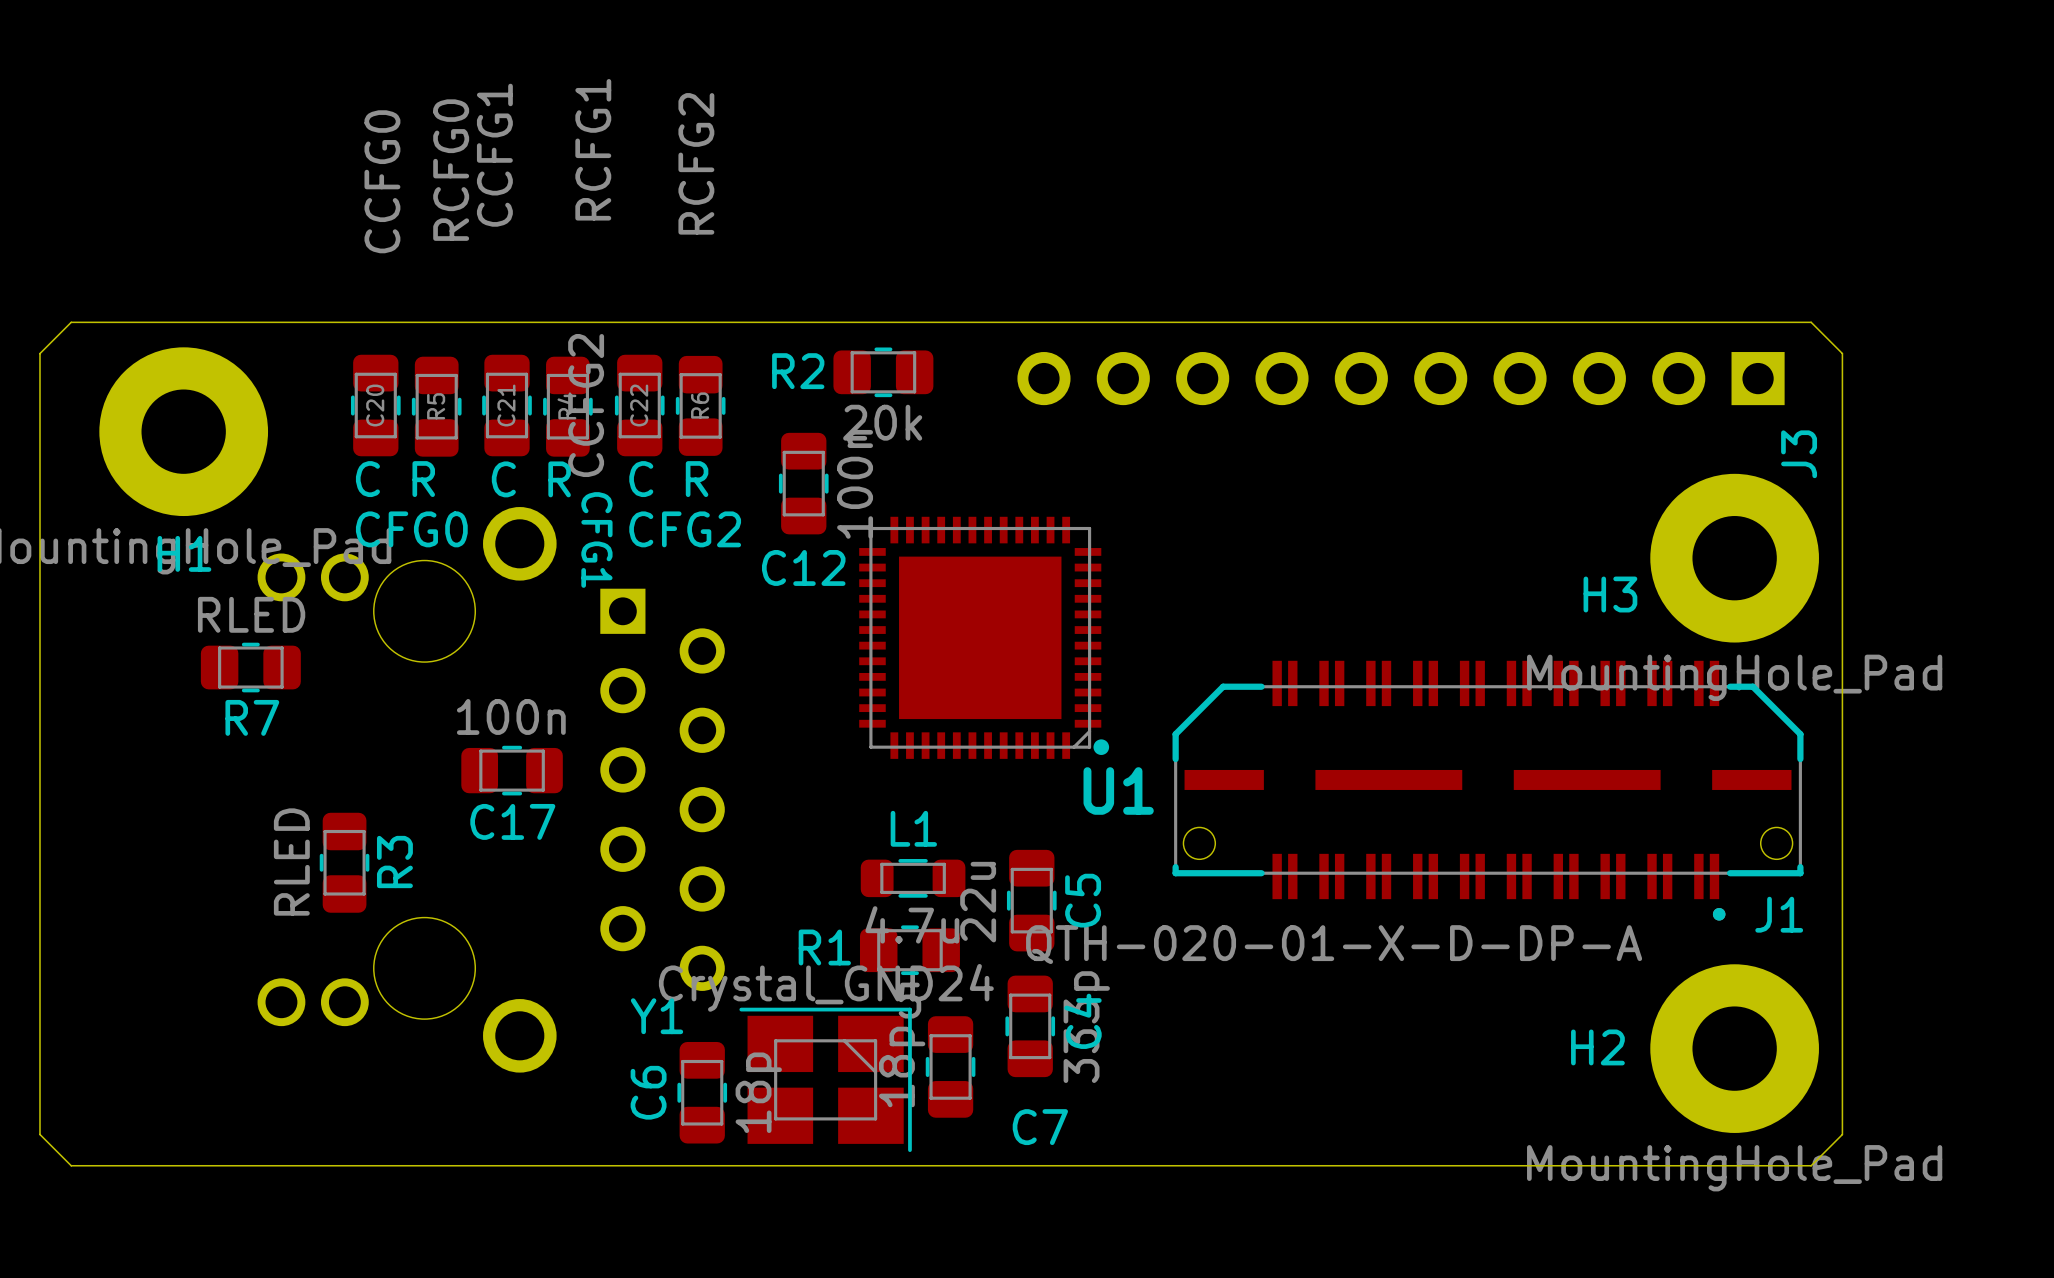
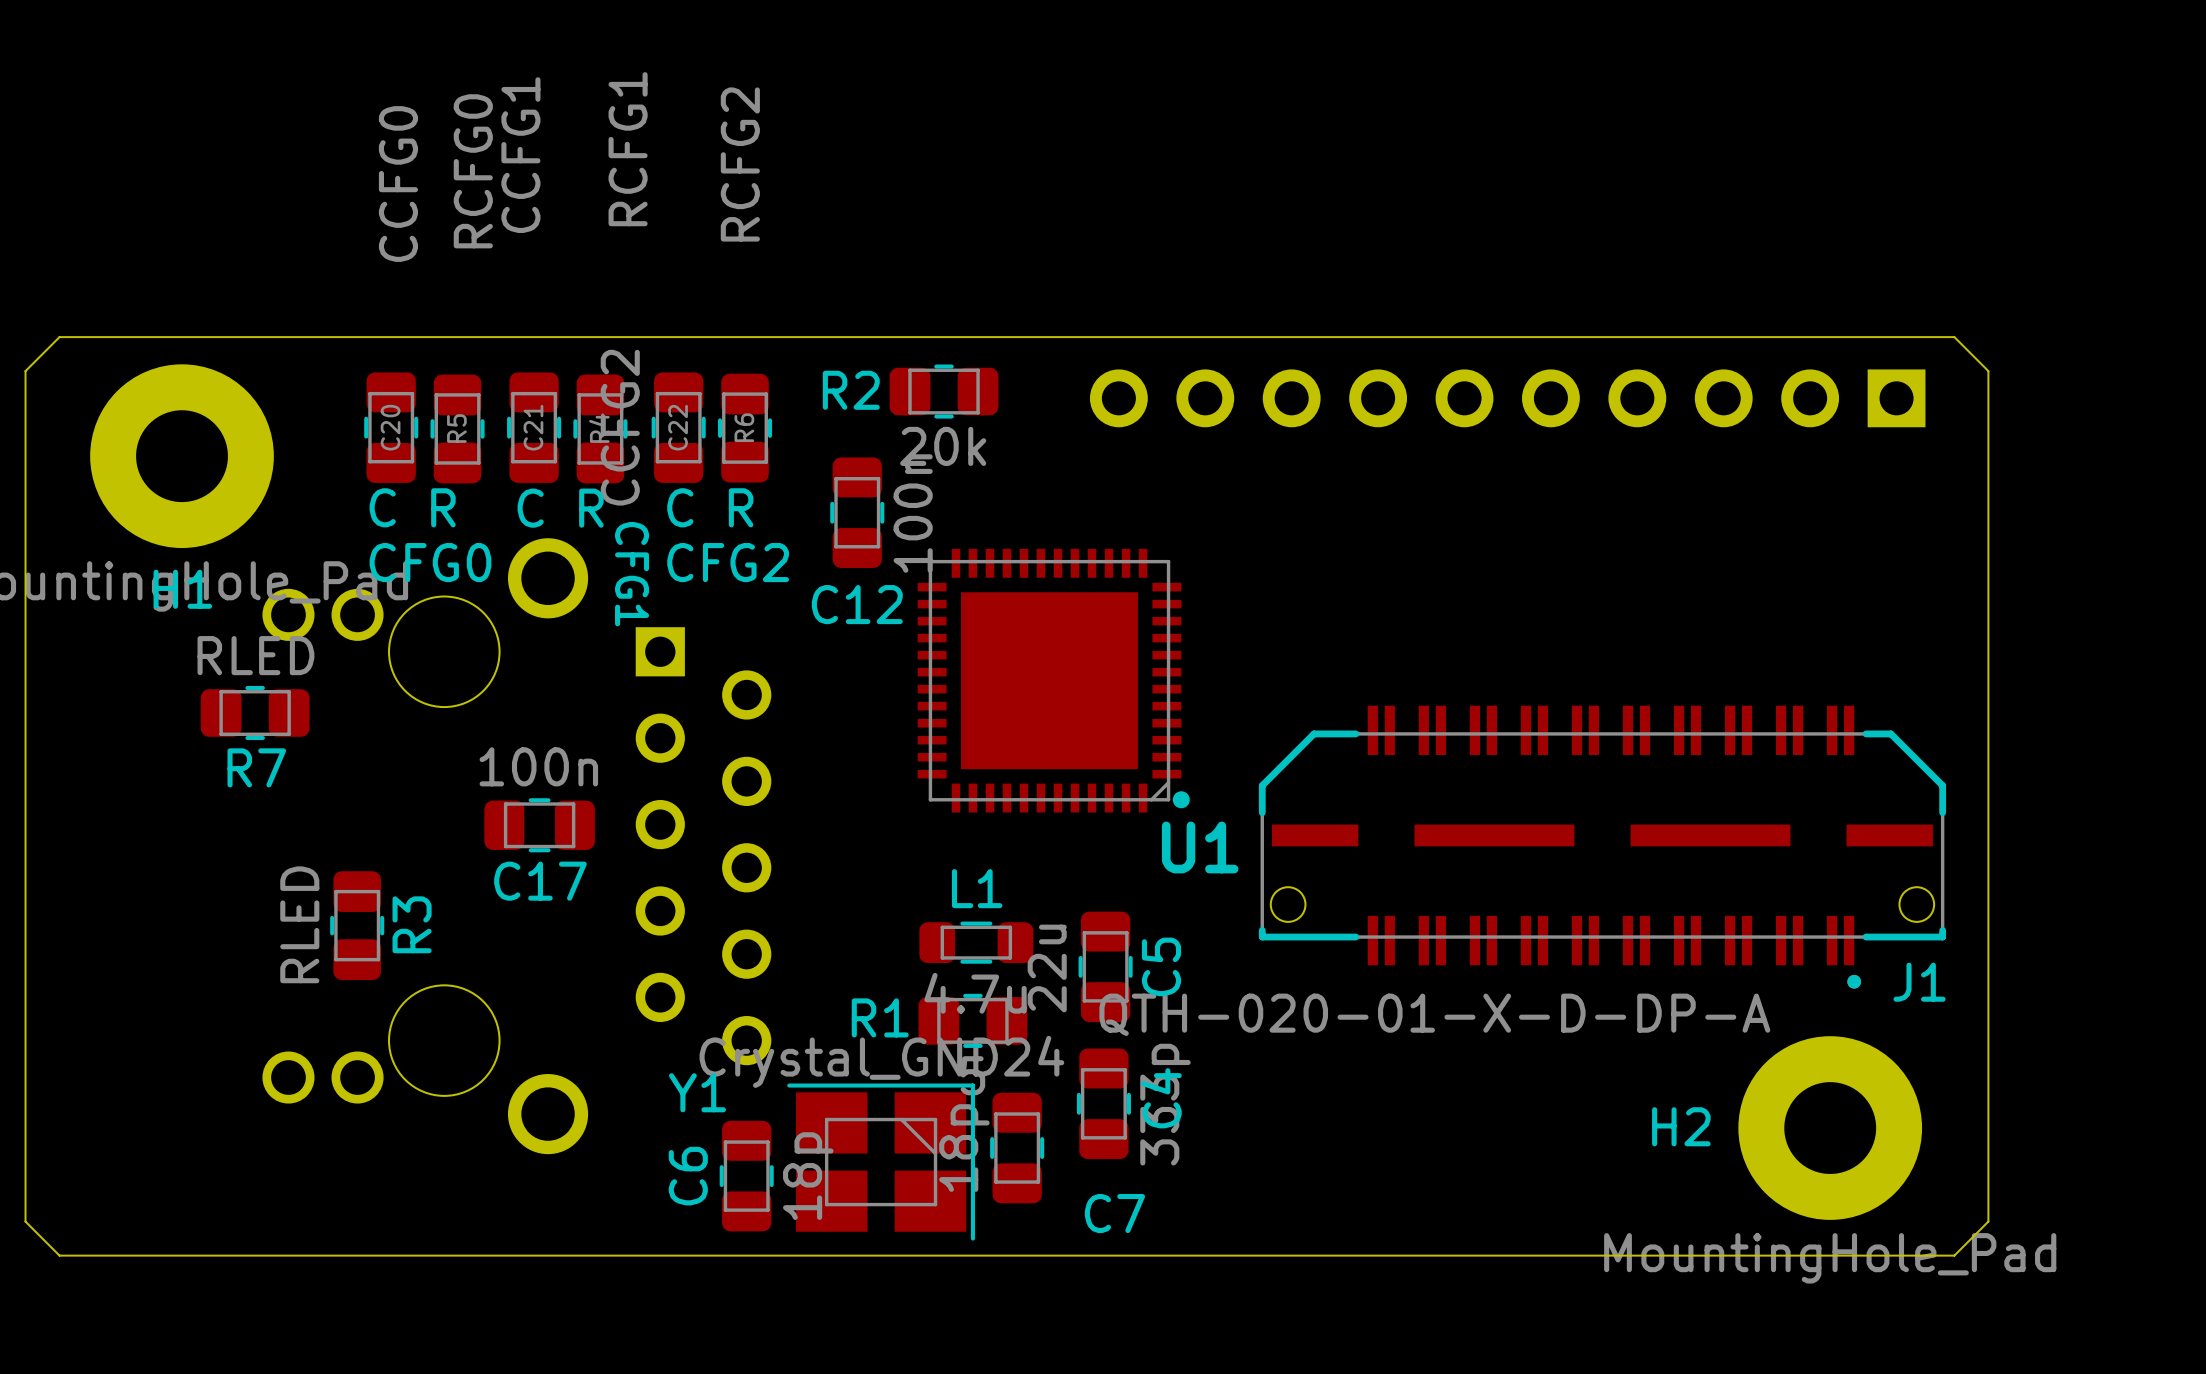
J3 name: J3 (1799, 454) -> none
H3: MountingHole_Pad (1734, 558) -> none
H2 position: (1734, 1048) -> (1830, 1128)

